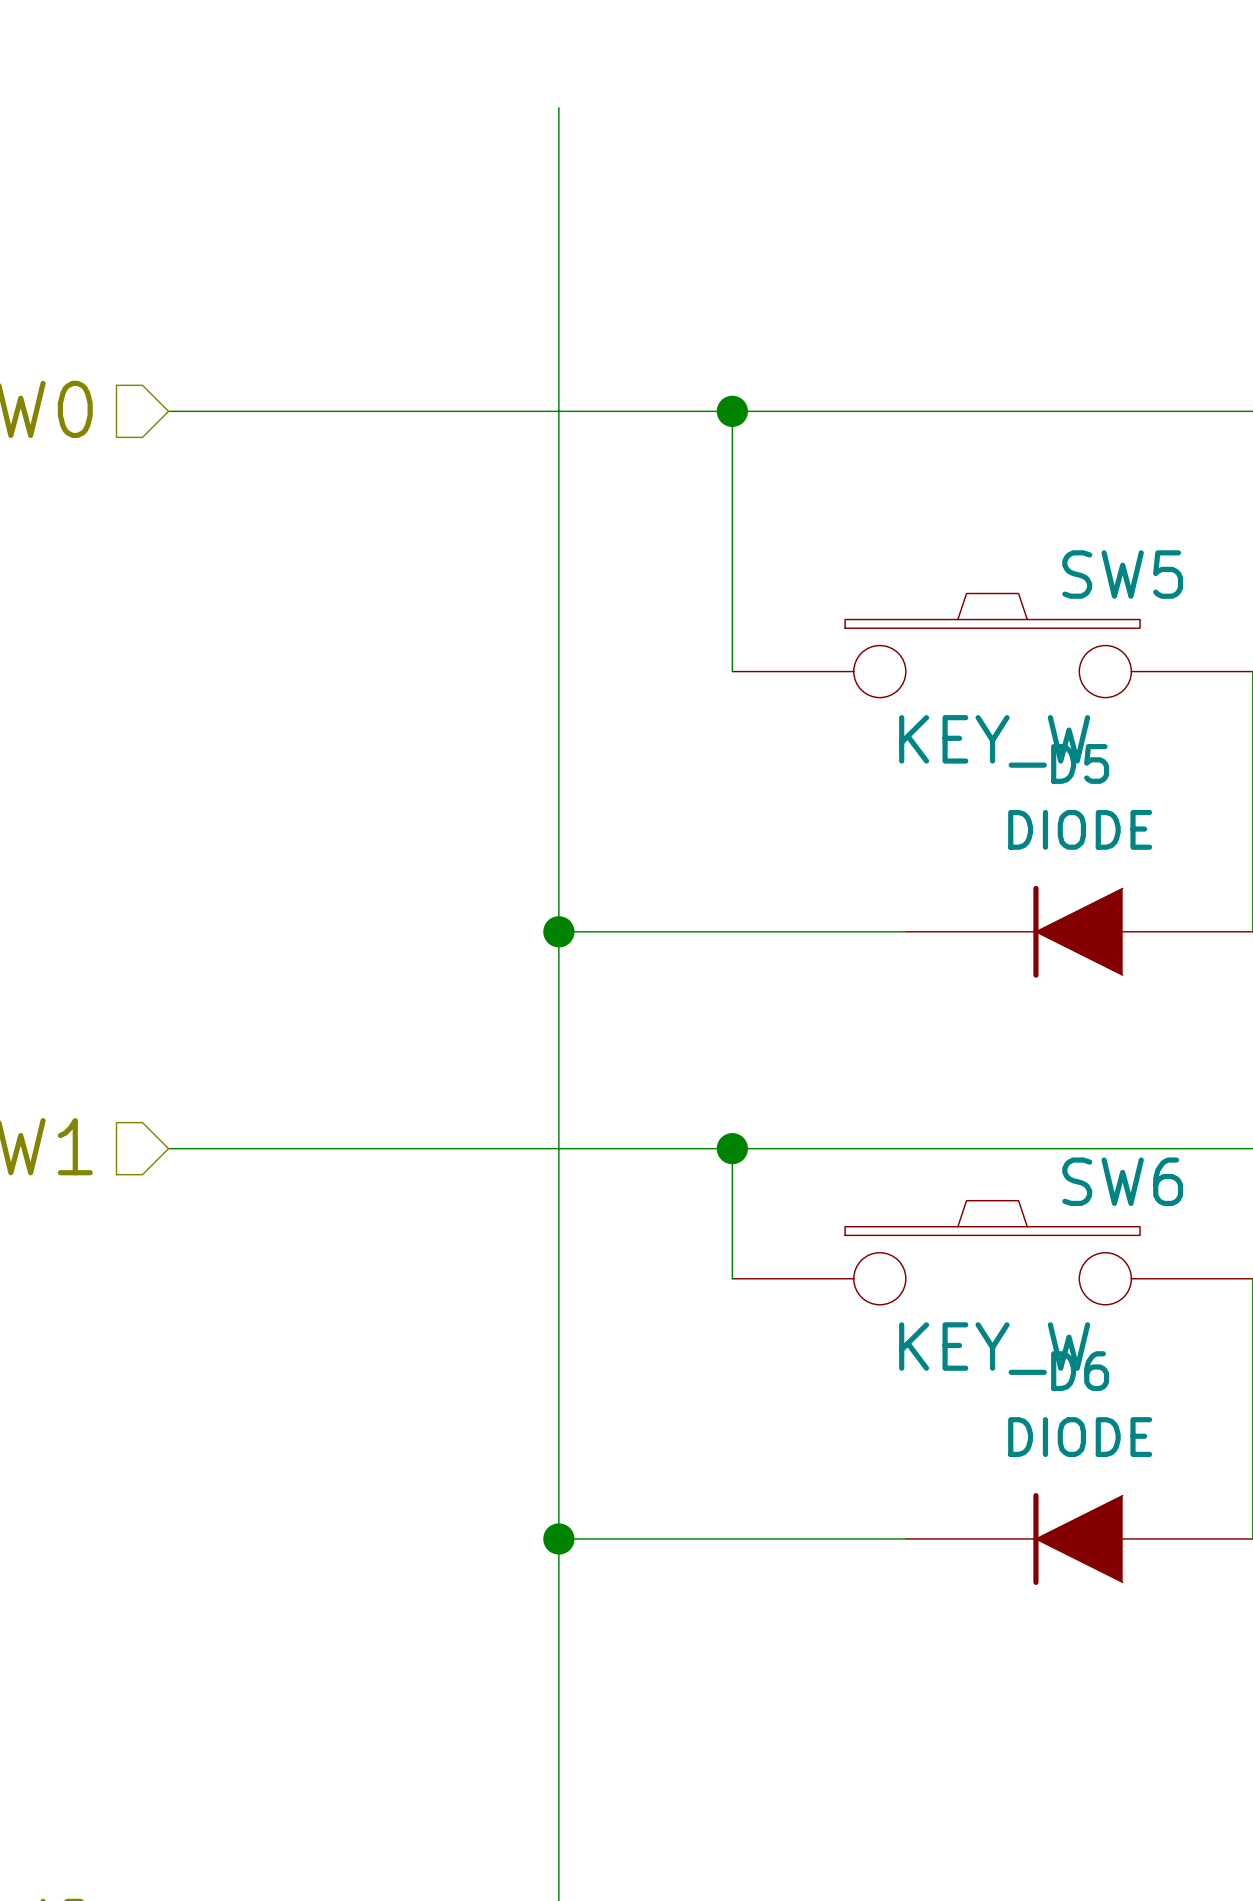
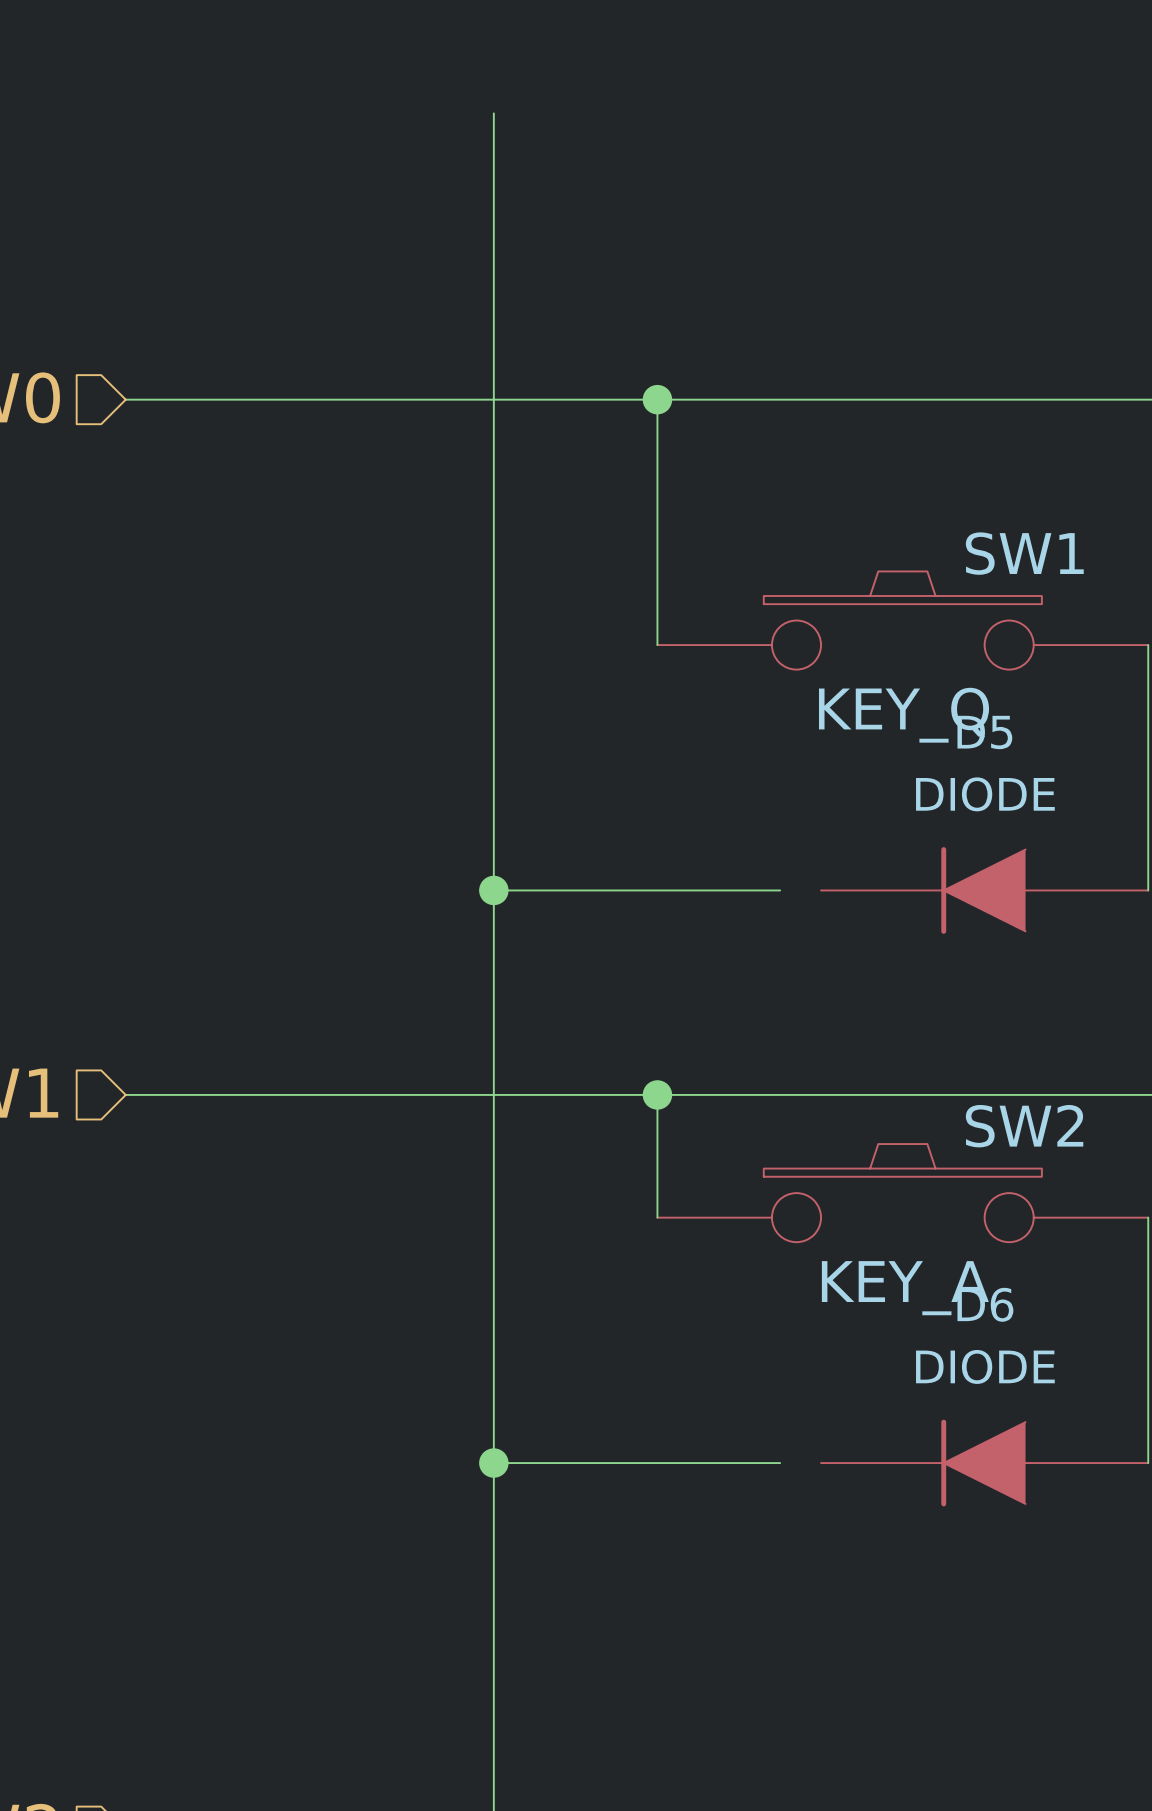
SW5 name: SW5 (1122, 574) -> SW1 (1024, 553)
SW5 value: KEY_W (994, 741) -> KEY_Q (904, 715)
wire: (862, 931) (905, 931) -> none
SW6 name: SW6 (1122, 1181) -> SW2 (1024, 1126)
SW6 value: KEY_W (994, 1348) -> KEY_A (905, 1288)
wire: (862, 1538) (905, 1538) -> none

